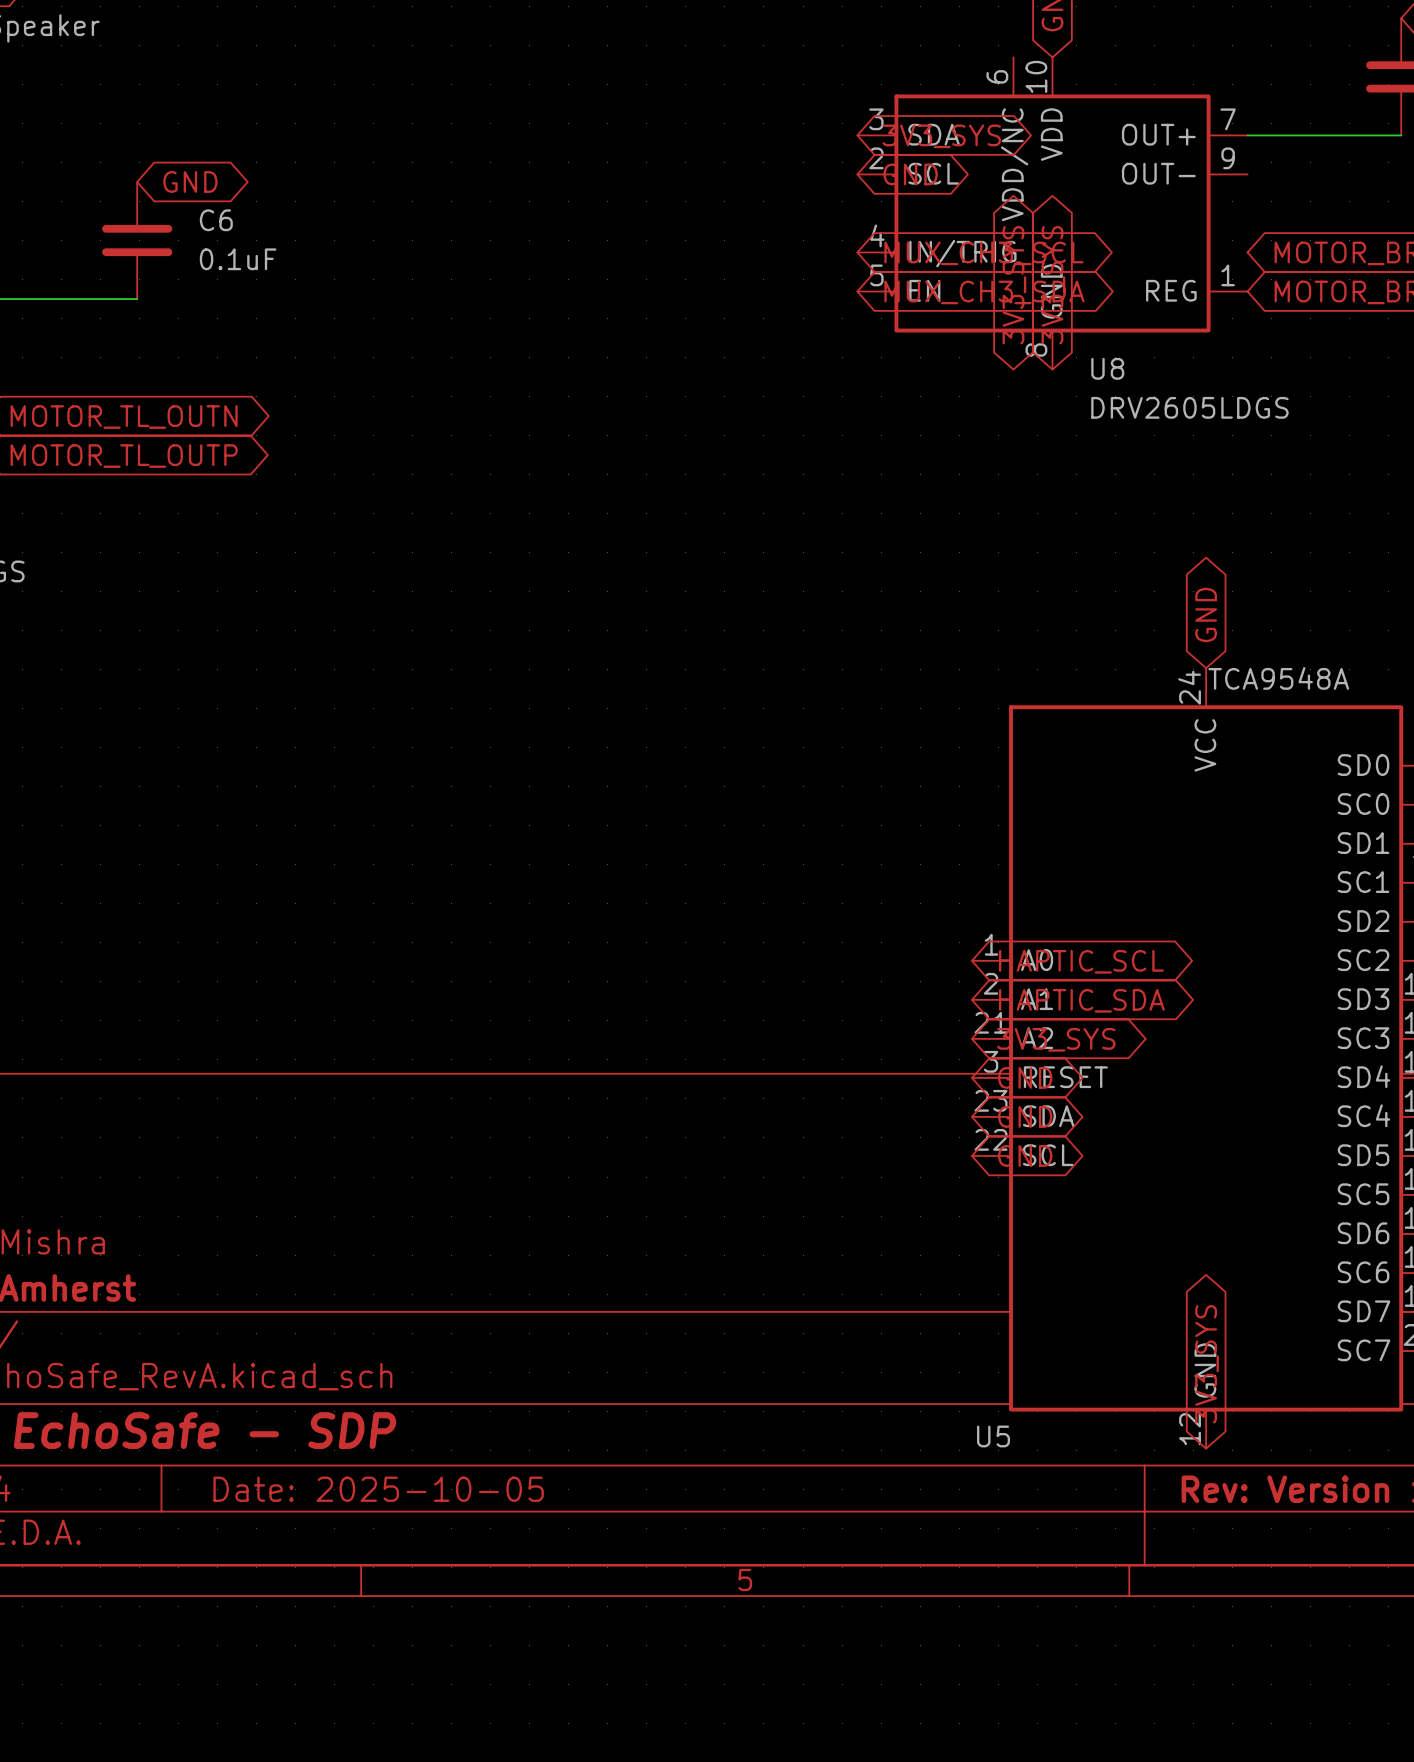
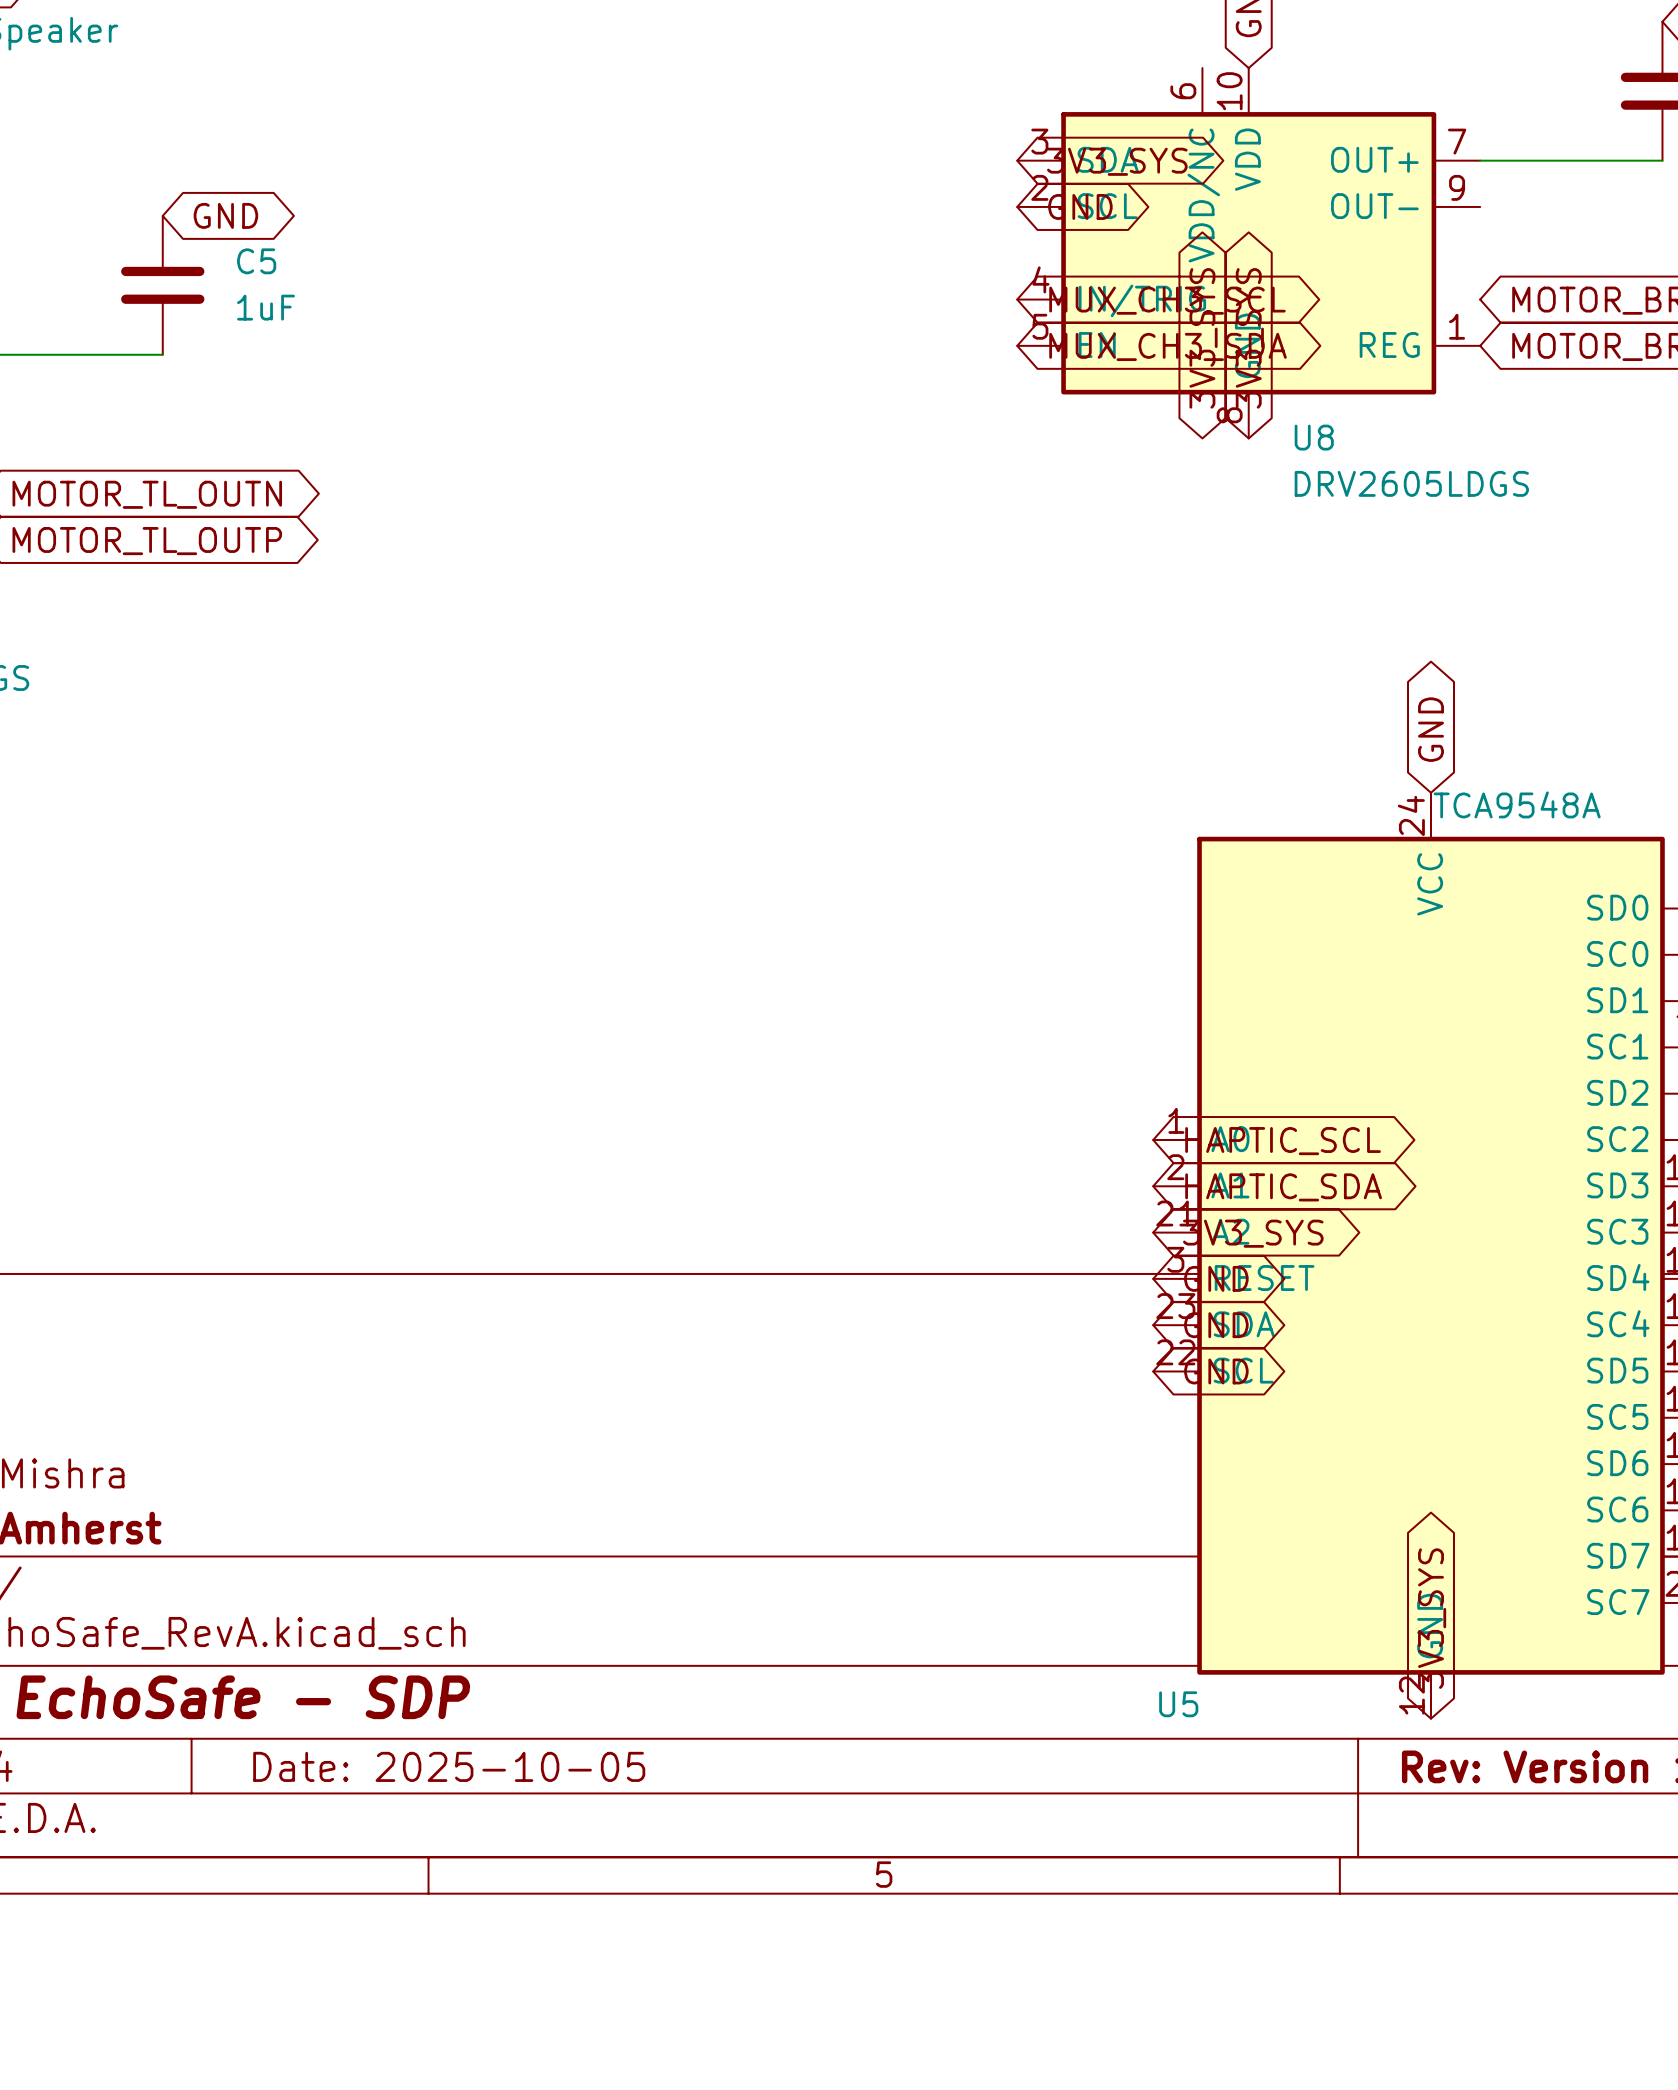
C6 name: C6 (216, 220) -> C5 (256, 261)
C6 value: 0.1uF (238, 259) -> 1uF (266, 307)

